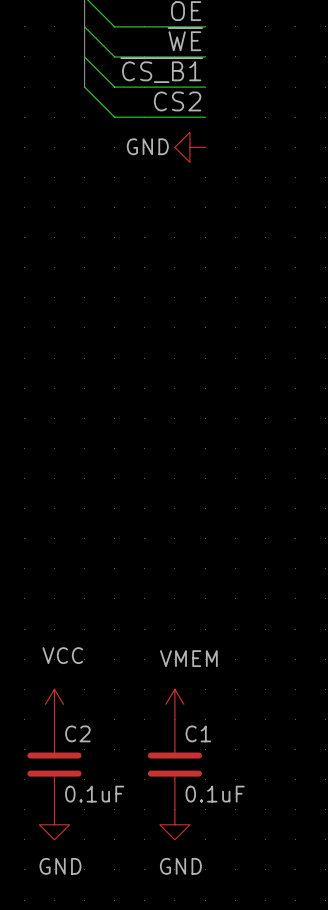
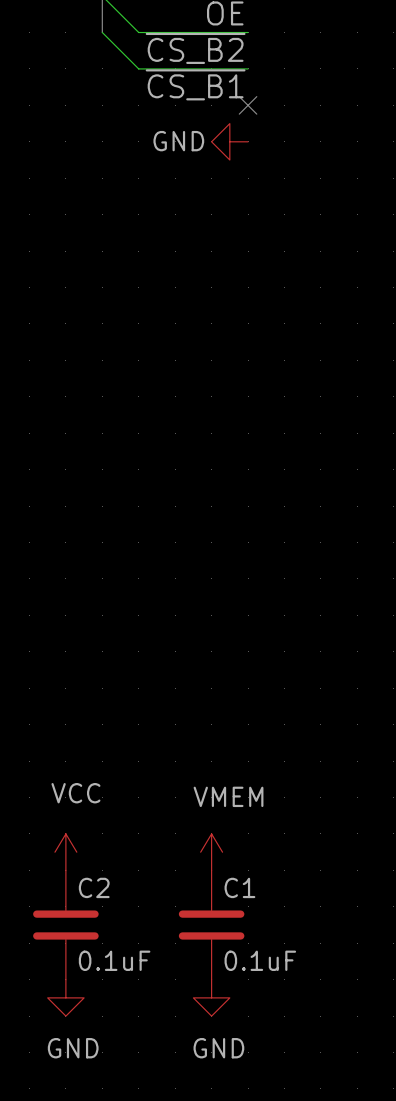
bus: (84, 26) (84, 87) -> none
label: ~{WE} (185, 39) -> ~{CS_B2} (195, 48)
wire: (84, 56) (114, 87) (205, 87) -> none
wire: (84, 87) (114, 117) (205, 117) -> none
no-connect mark: none -> (248, 105)
label: CS2 (177, 101) -> none
power symbol position: GND (189, 147) -> GND (229, 141)

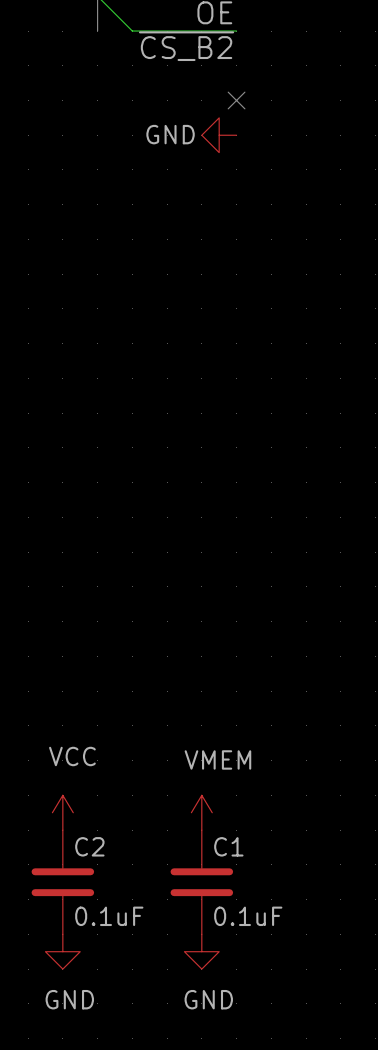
wire: (102, 32) (138, 68) (248, 68) -> none
label: ~{CS_B1} (195, 84) -> none

